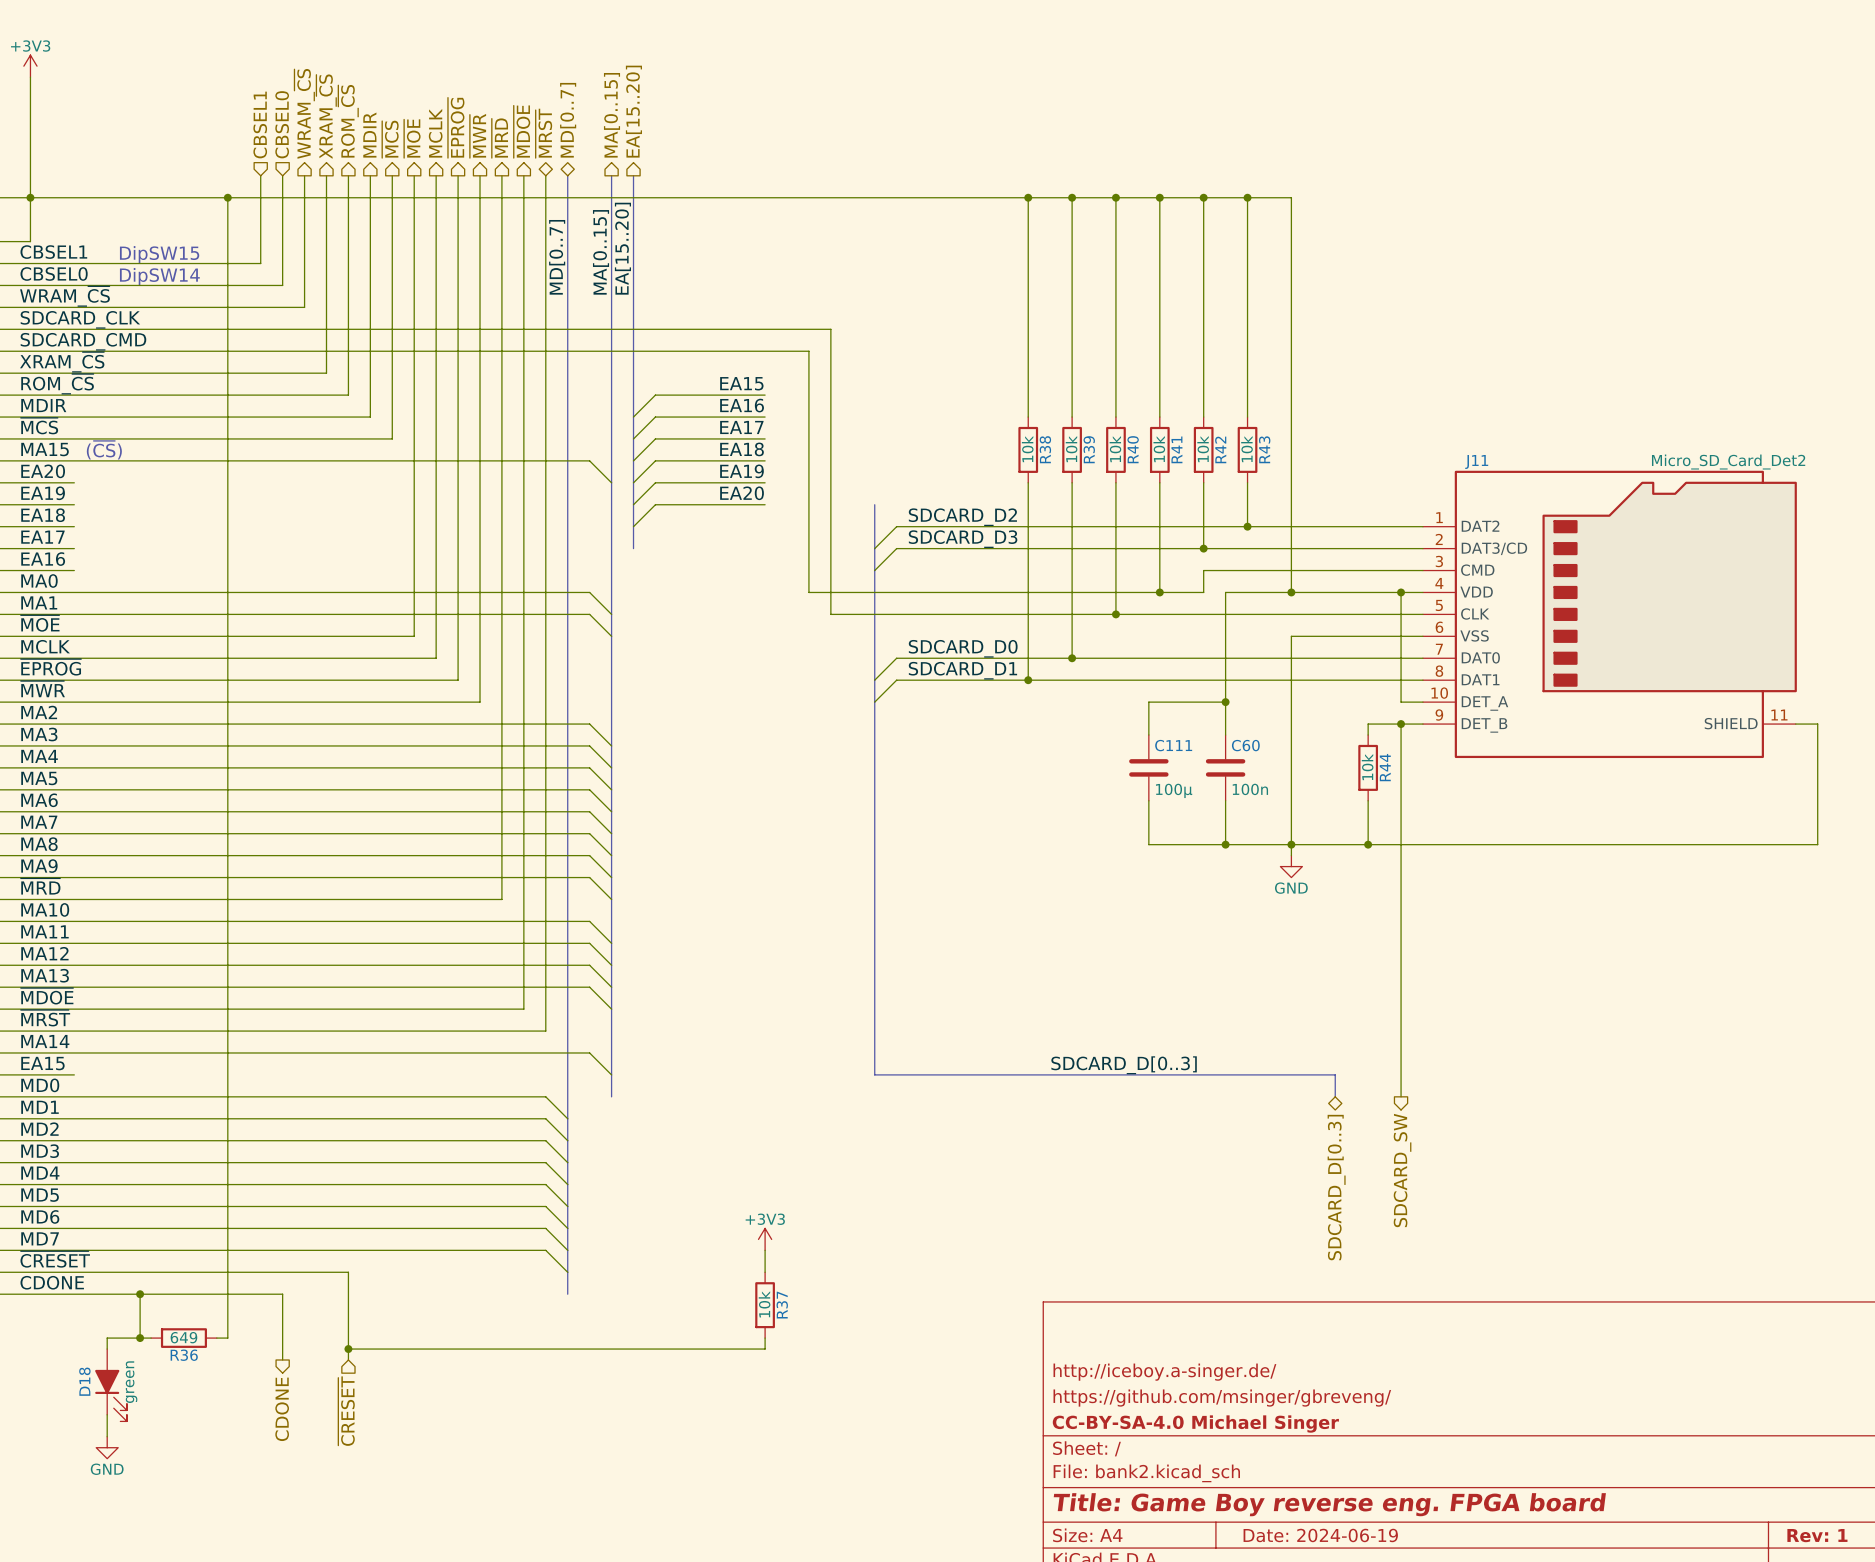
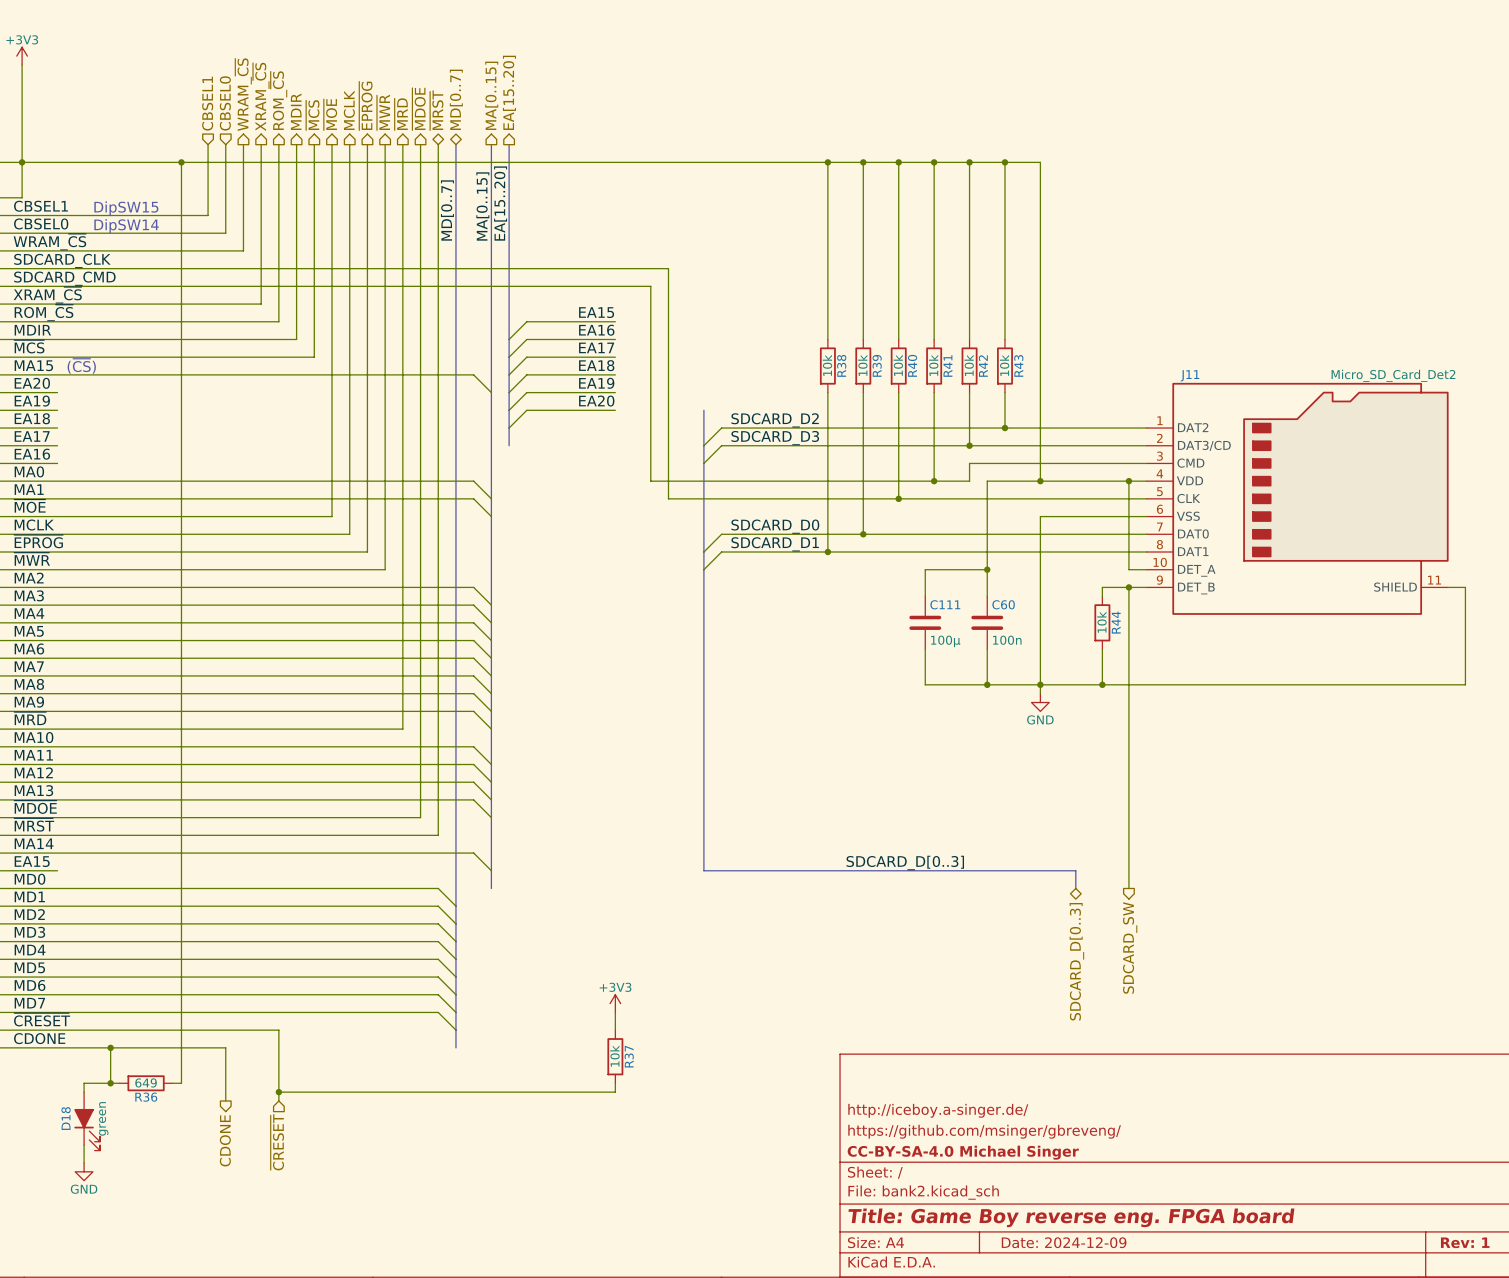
title block: Date: 2024-06-19 (1320, 1535) -> Date: 2024-12-09 (1064, 1242)

